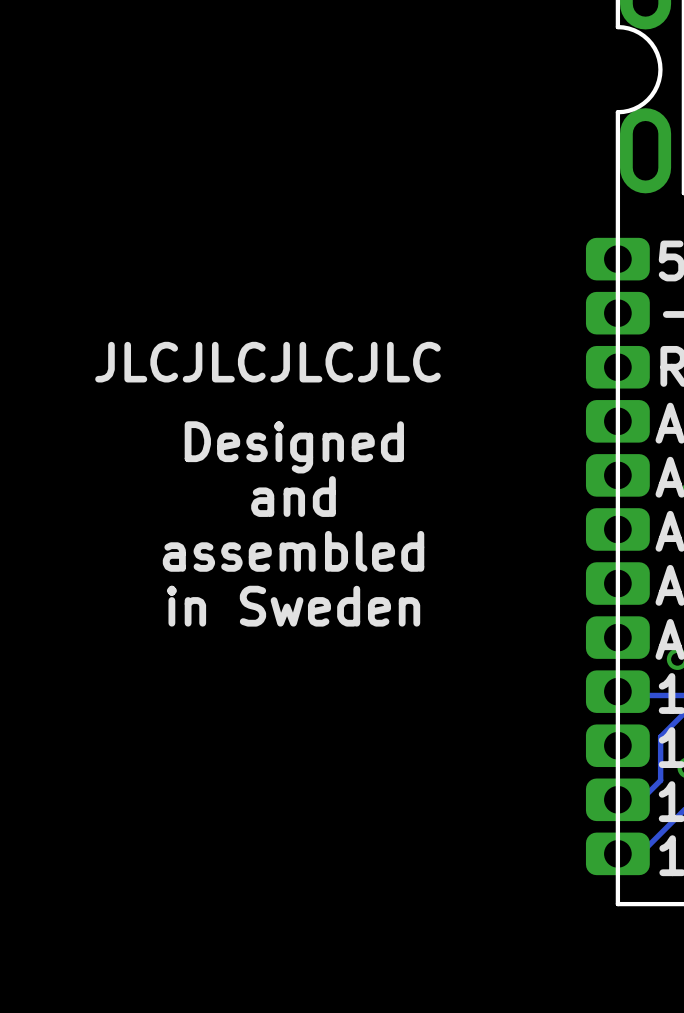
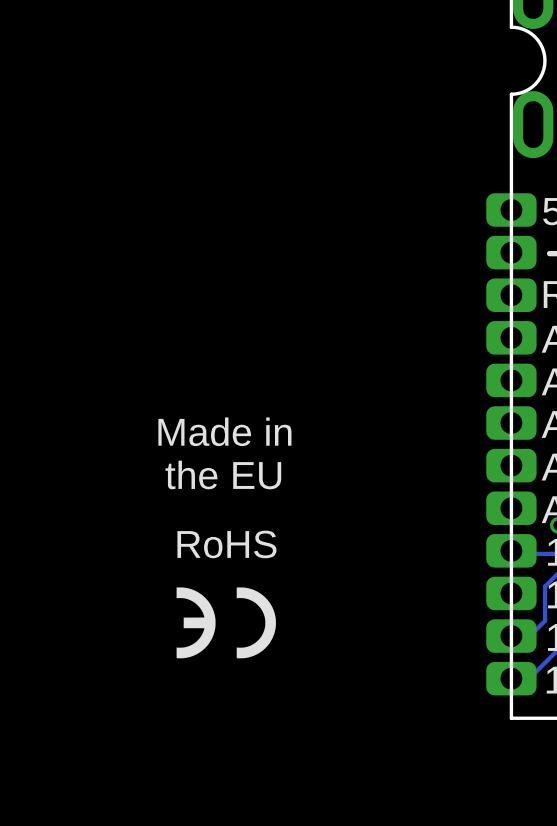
text: JLCJLCJLCJLC (267, 362) -> none
text: Designed (294, 447) -> none
text: and (293, 496) -> none
text: none -> Made in (224, 431)
text: assembled (293, 551) -> none
text: none -> the EU (223, 474)
text: in Sweden (293, 606) -> none
text: none -> RoHS (226, 544)
drawing: none -> [176, 587, 276, 659]

